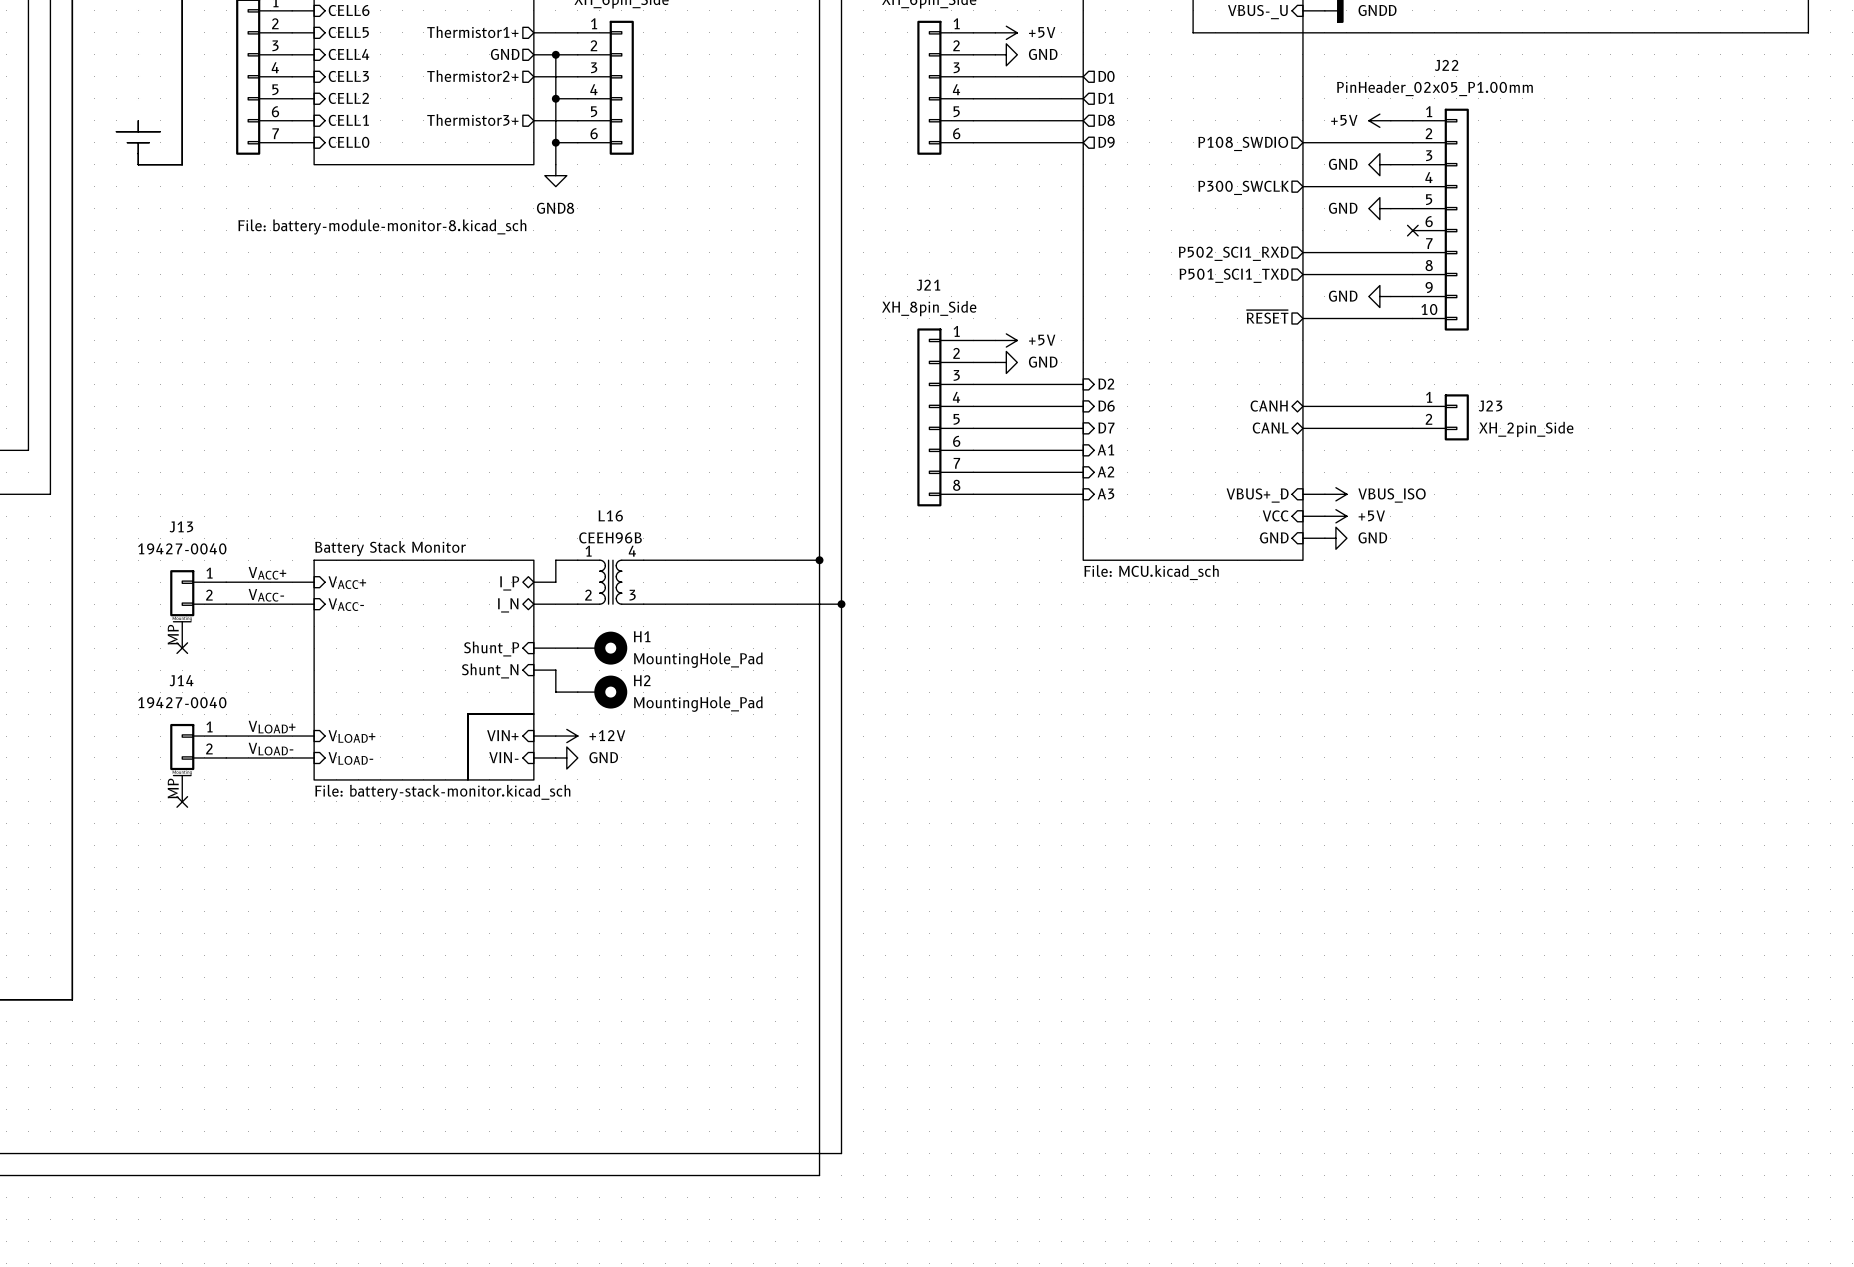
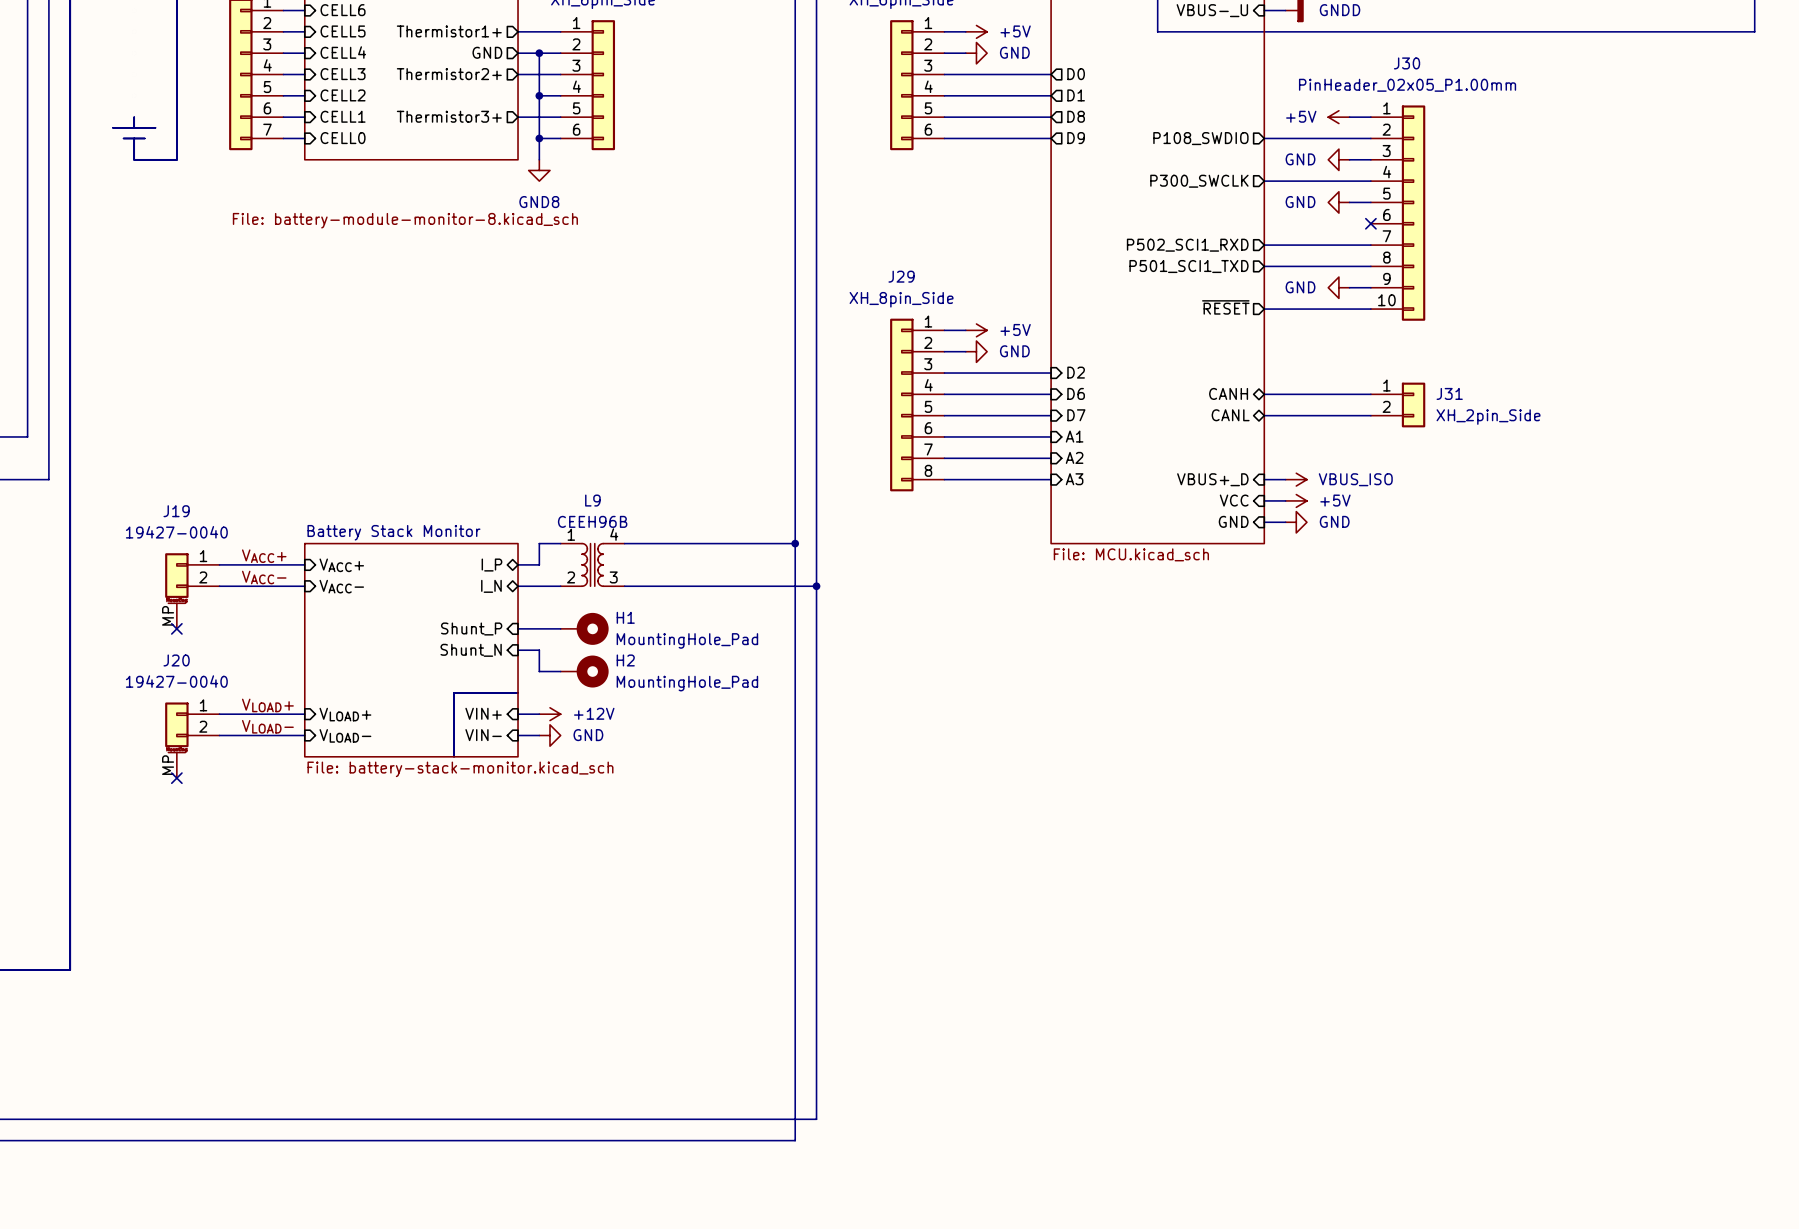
J22 name: J22 (1446, 65) -> J30 (1407, 63)
J21 name: J21 (928, 285) -> J29 (901, 276)
J23 name: J23 (1490, 406) -> J31 (1449, 393)
L16 name: L16 (610, 515) -> L9 (592, 500)
J13 name: J13 (181, 526) -> J19 (176, 511)
J14 name: J14 (181, 680) -> J20 (176, 660)

